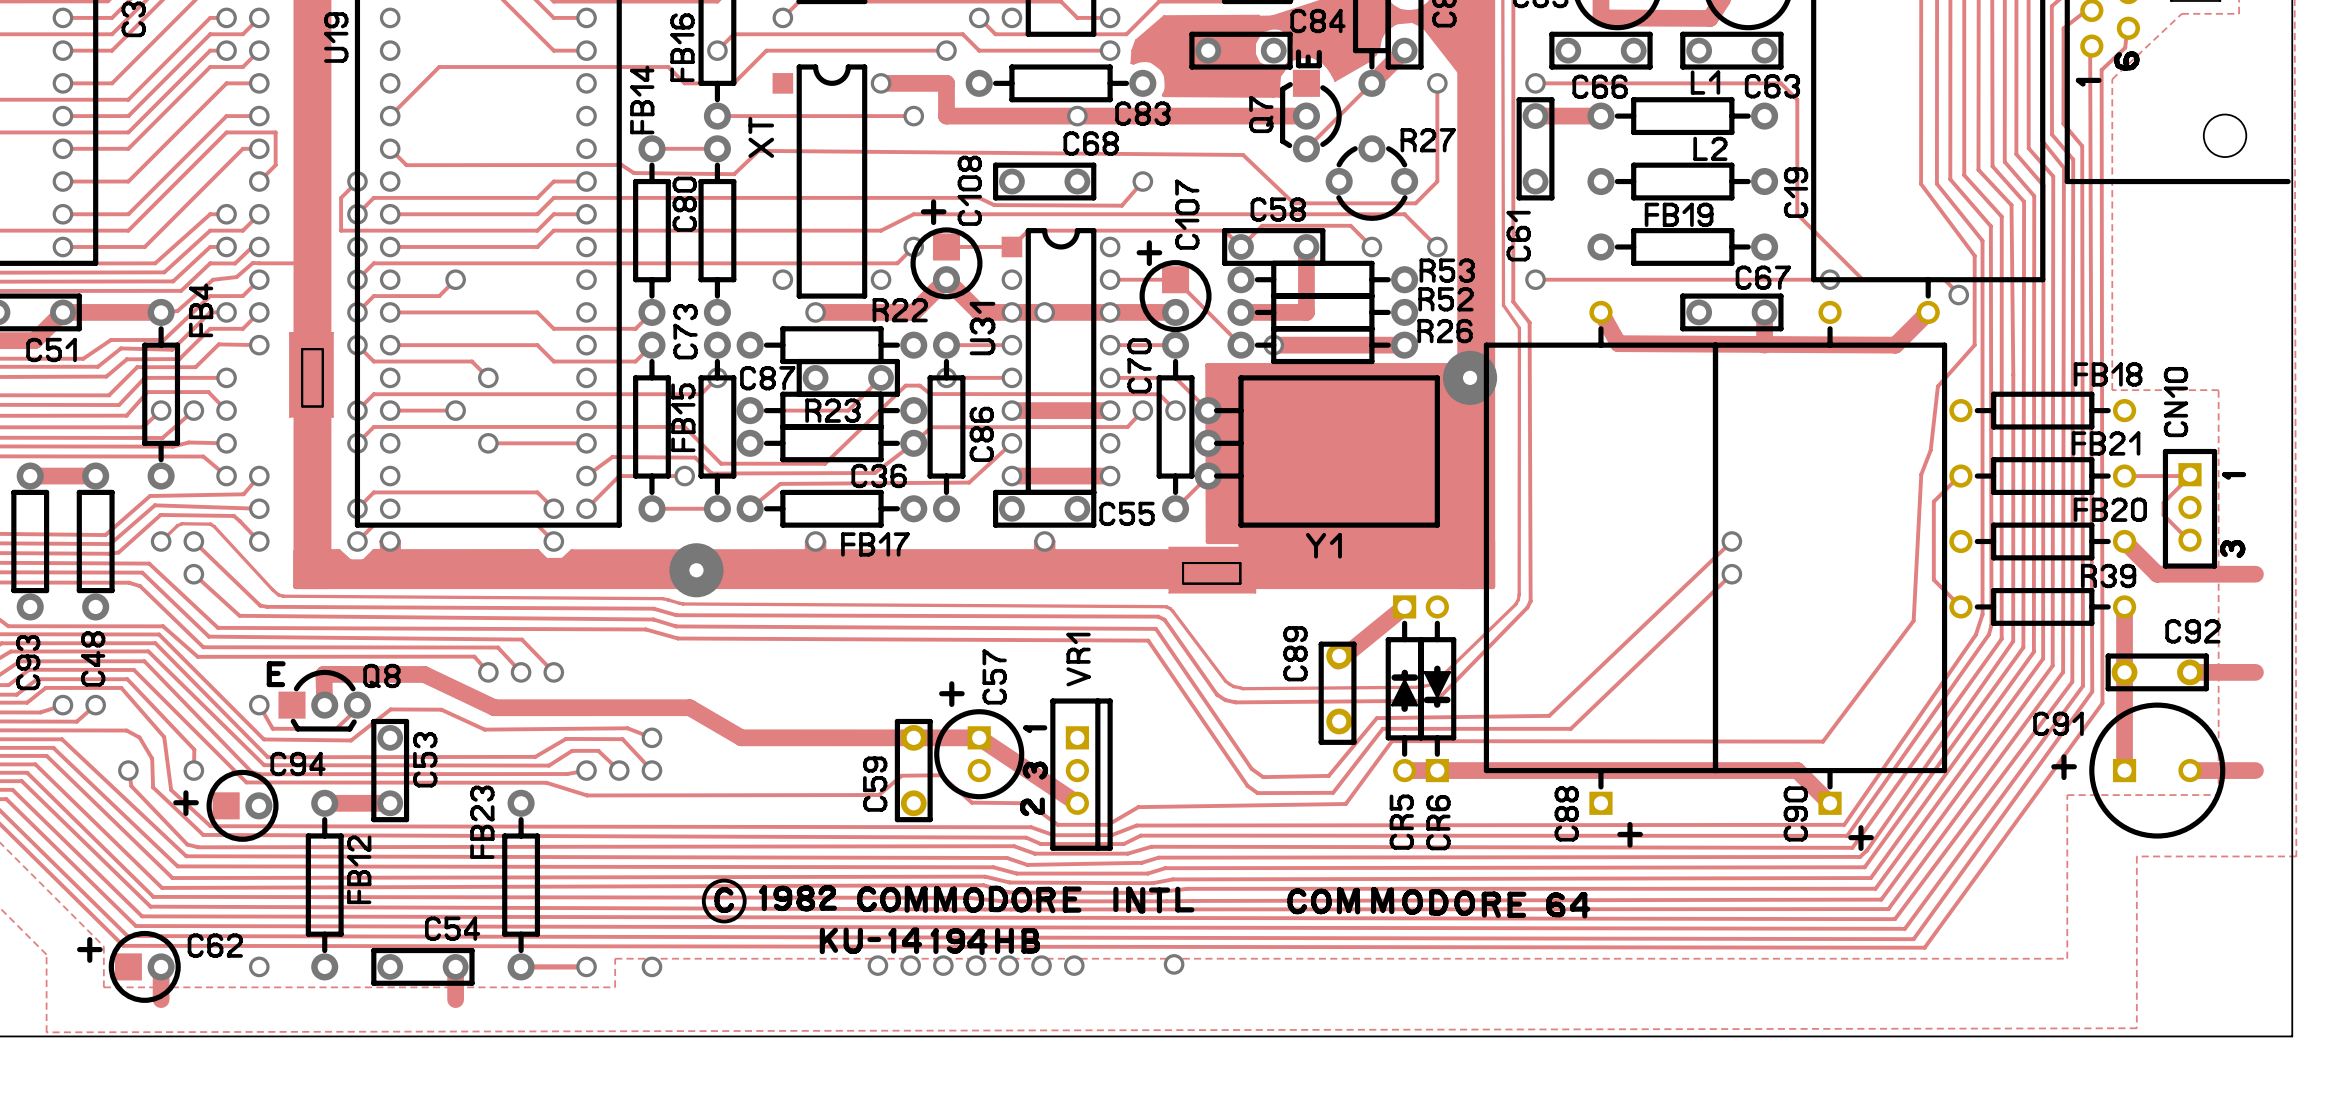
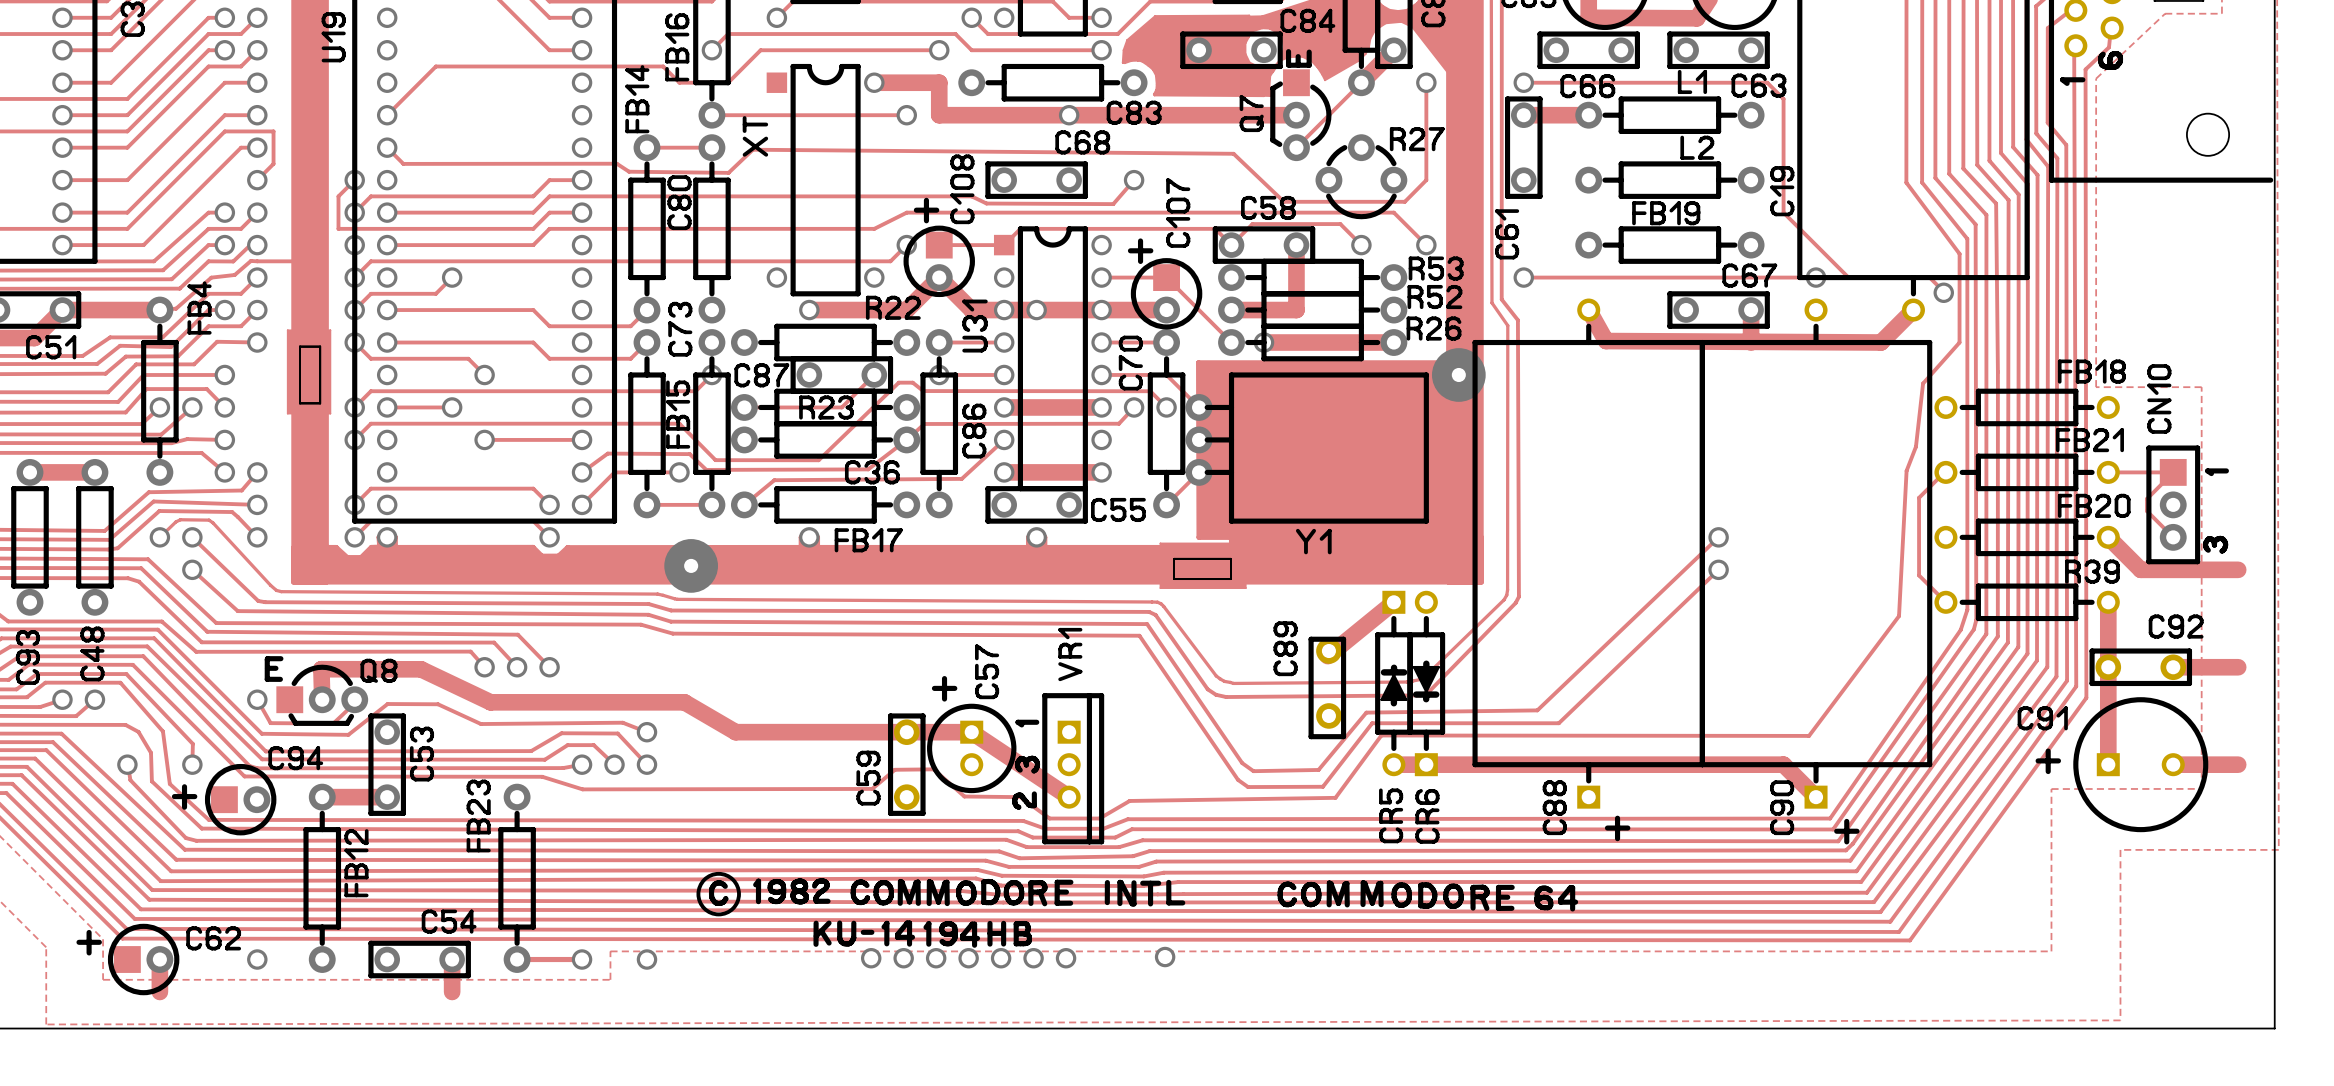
drawing: none -> [2159, 458, 2187, 486]
part: (2189, 507) -> none
via: none -> (2173, 504)
via: none -> (2173, 537)

